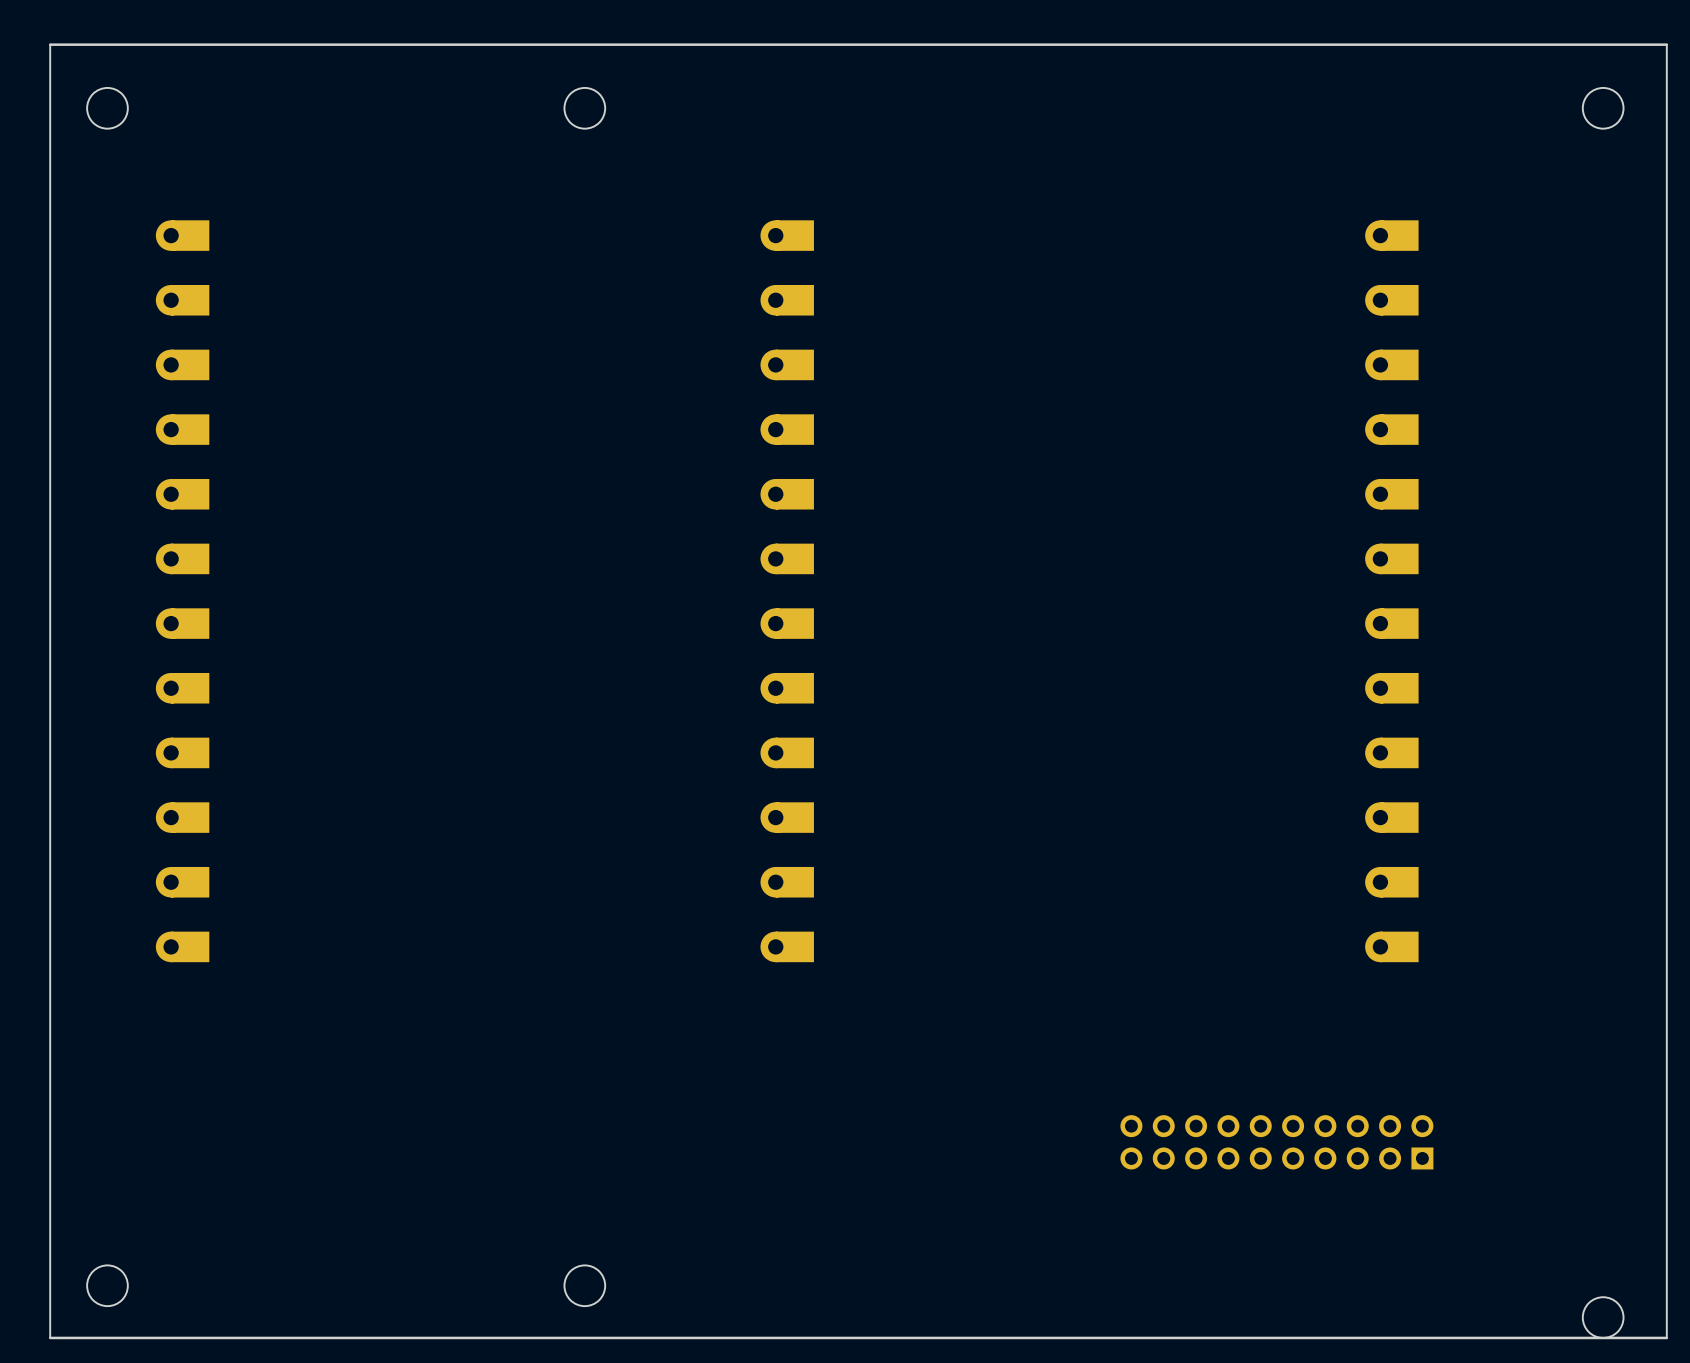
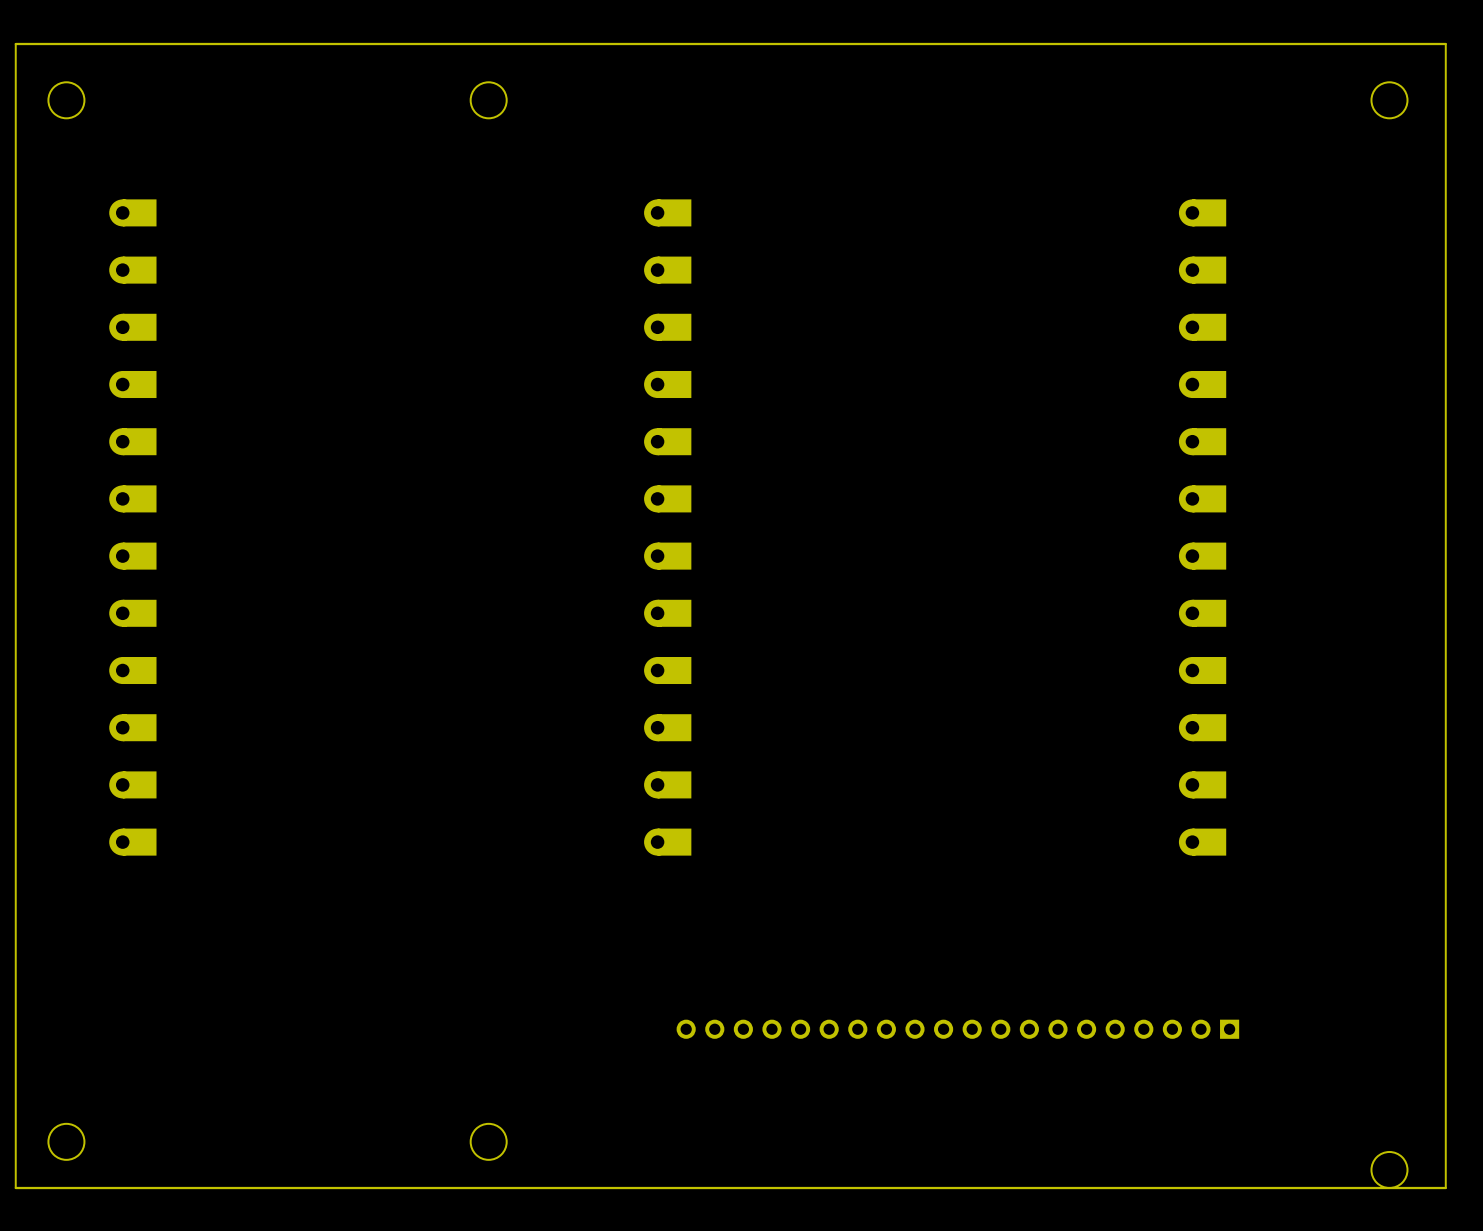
part: (1276, 1142) -> none
part: none -> (957, 1029)

